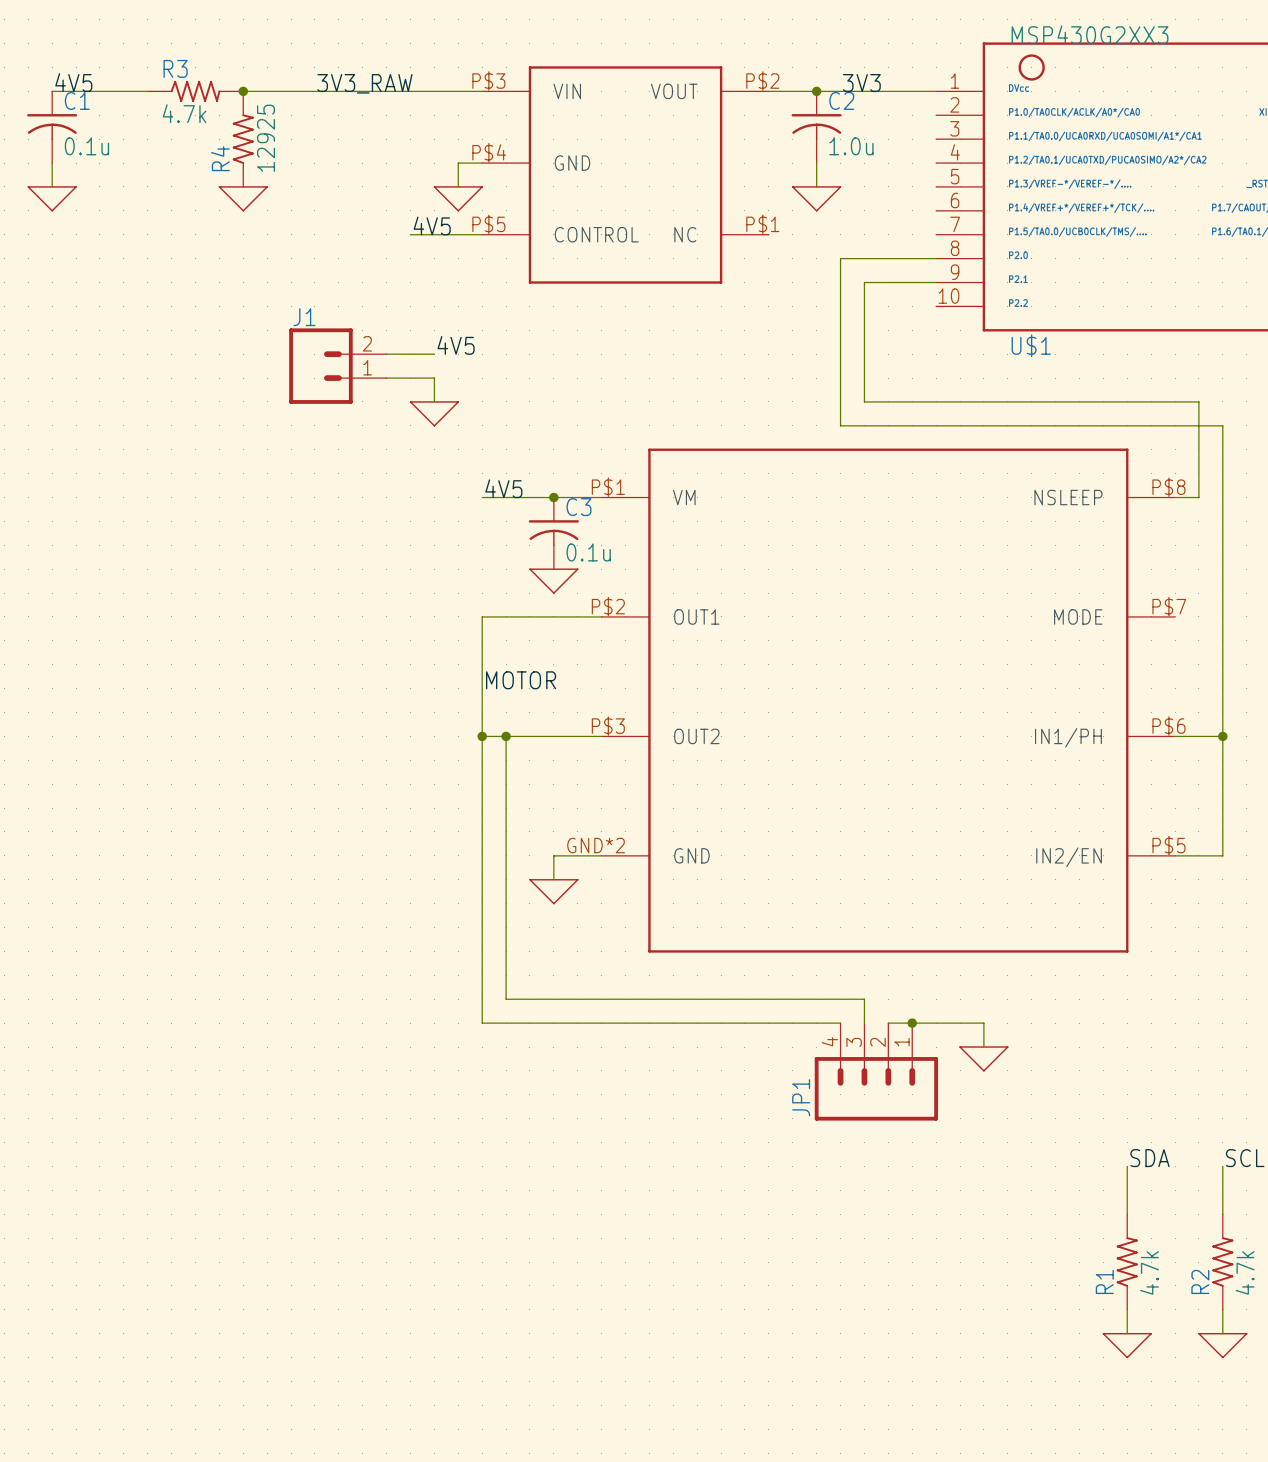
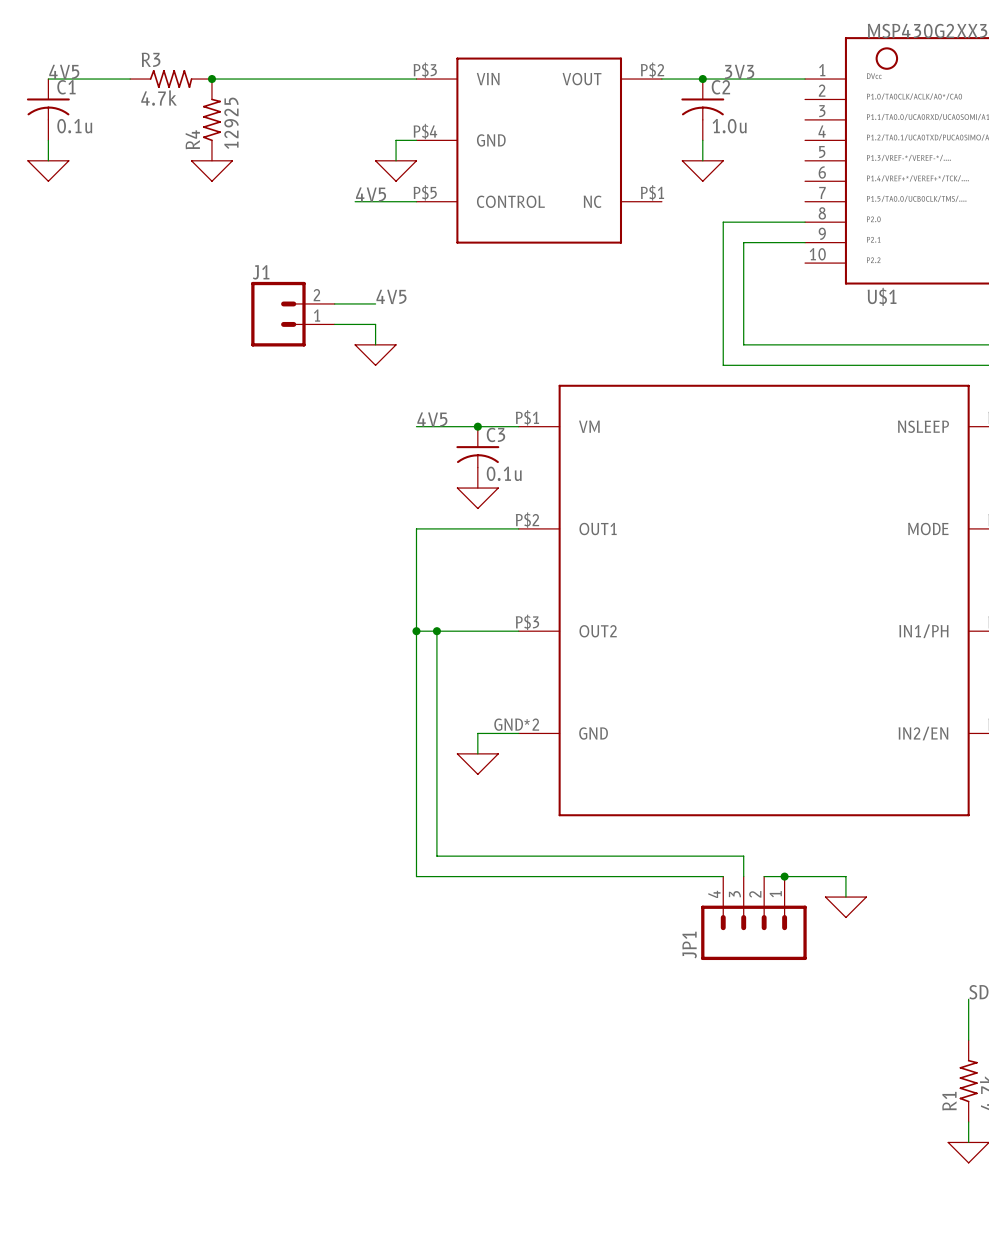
label: 3V3_RAW (364, 83) -> none
label: MOTOR (521, 680) -> none

